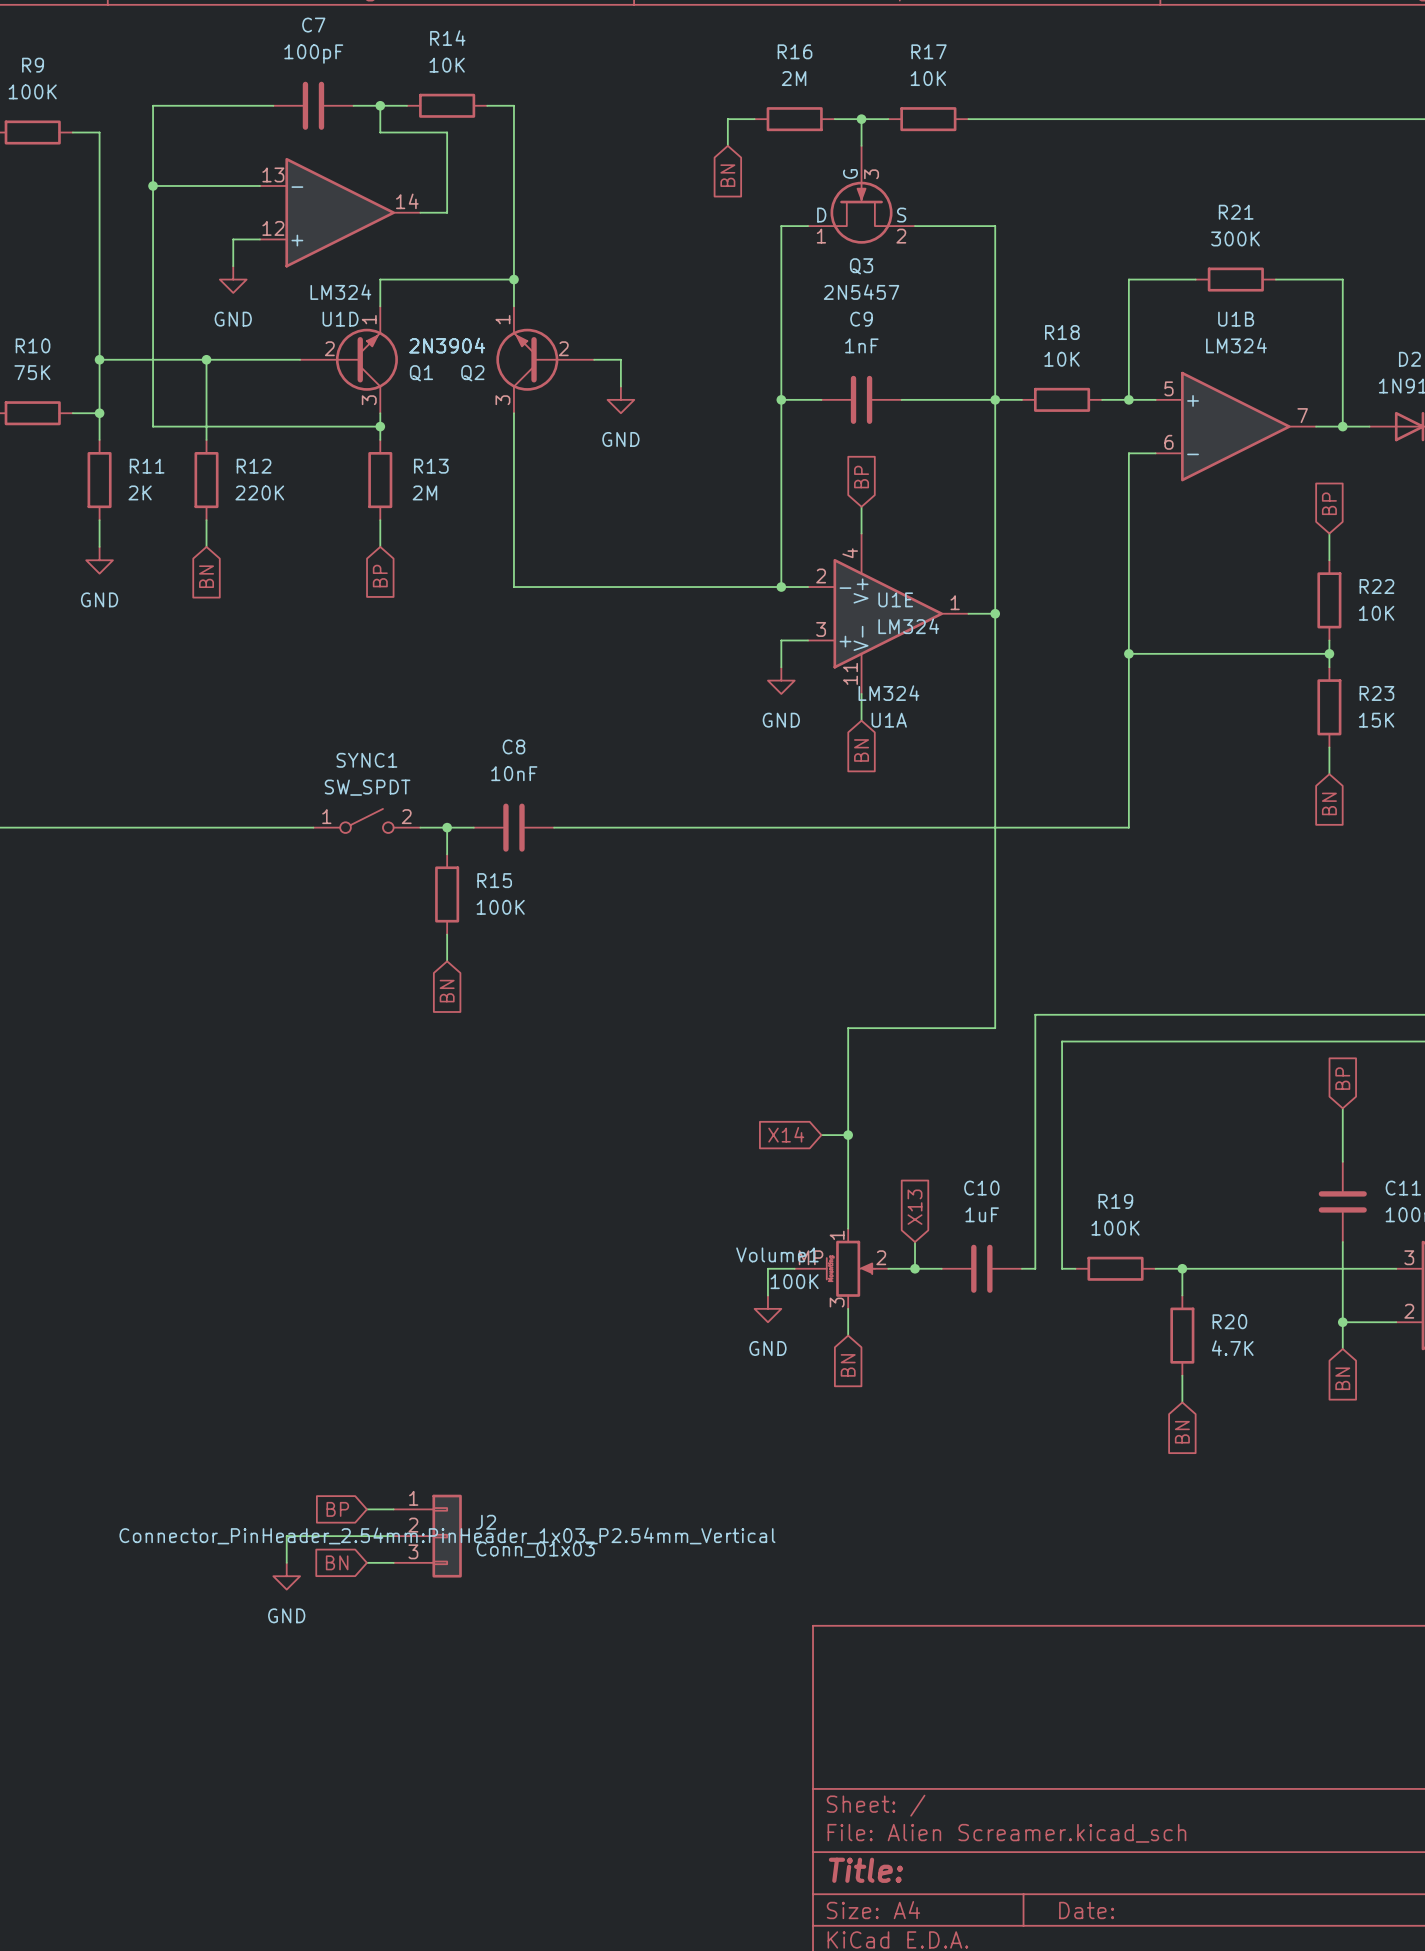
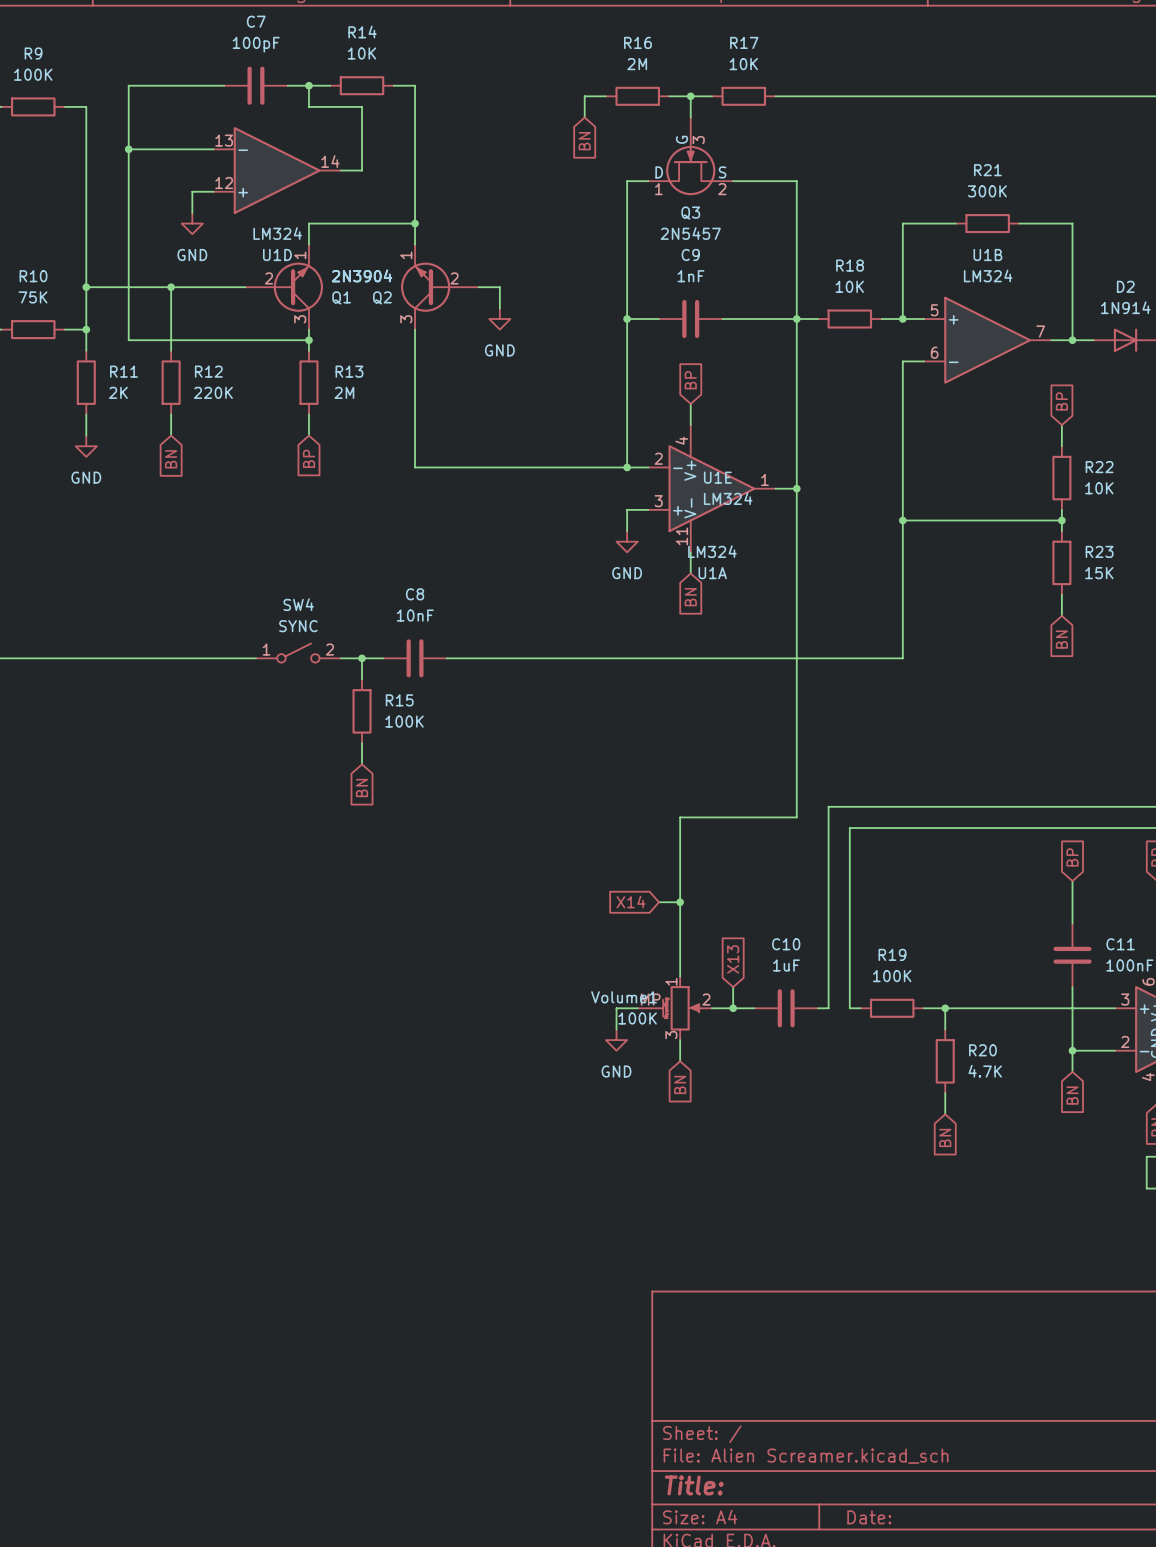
SYNC1 name: SYNC1 (366, 760) -> SW4 (298, 604)
SYNC1 value: SW_SPDT (367, 787) -> SYNC (298, 626)
global label: BP (337, 1509) -> none
wire: (366, 1509) (393, 1509) -> none
wire: (393, 1536) (286, 1536) (286, 1562) -> none
J2: Conn_01x03 (427, 1536) -> none
global label: BN (337, 1562) -> none
wire: (366, 1562) (393, 1562) -> none
power symbol: GND (286, 1576) -> none

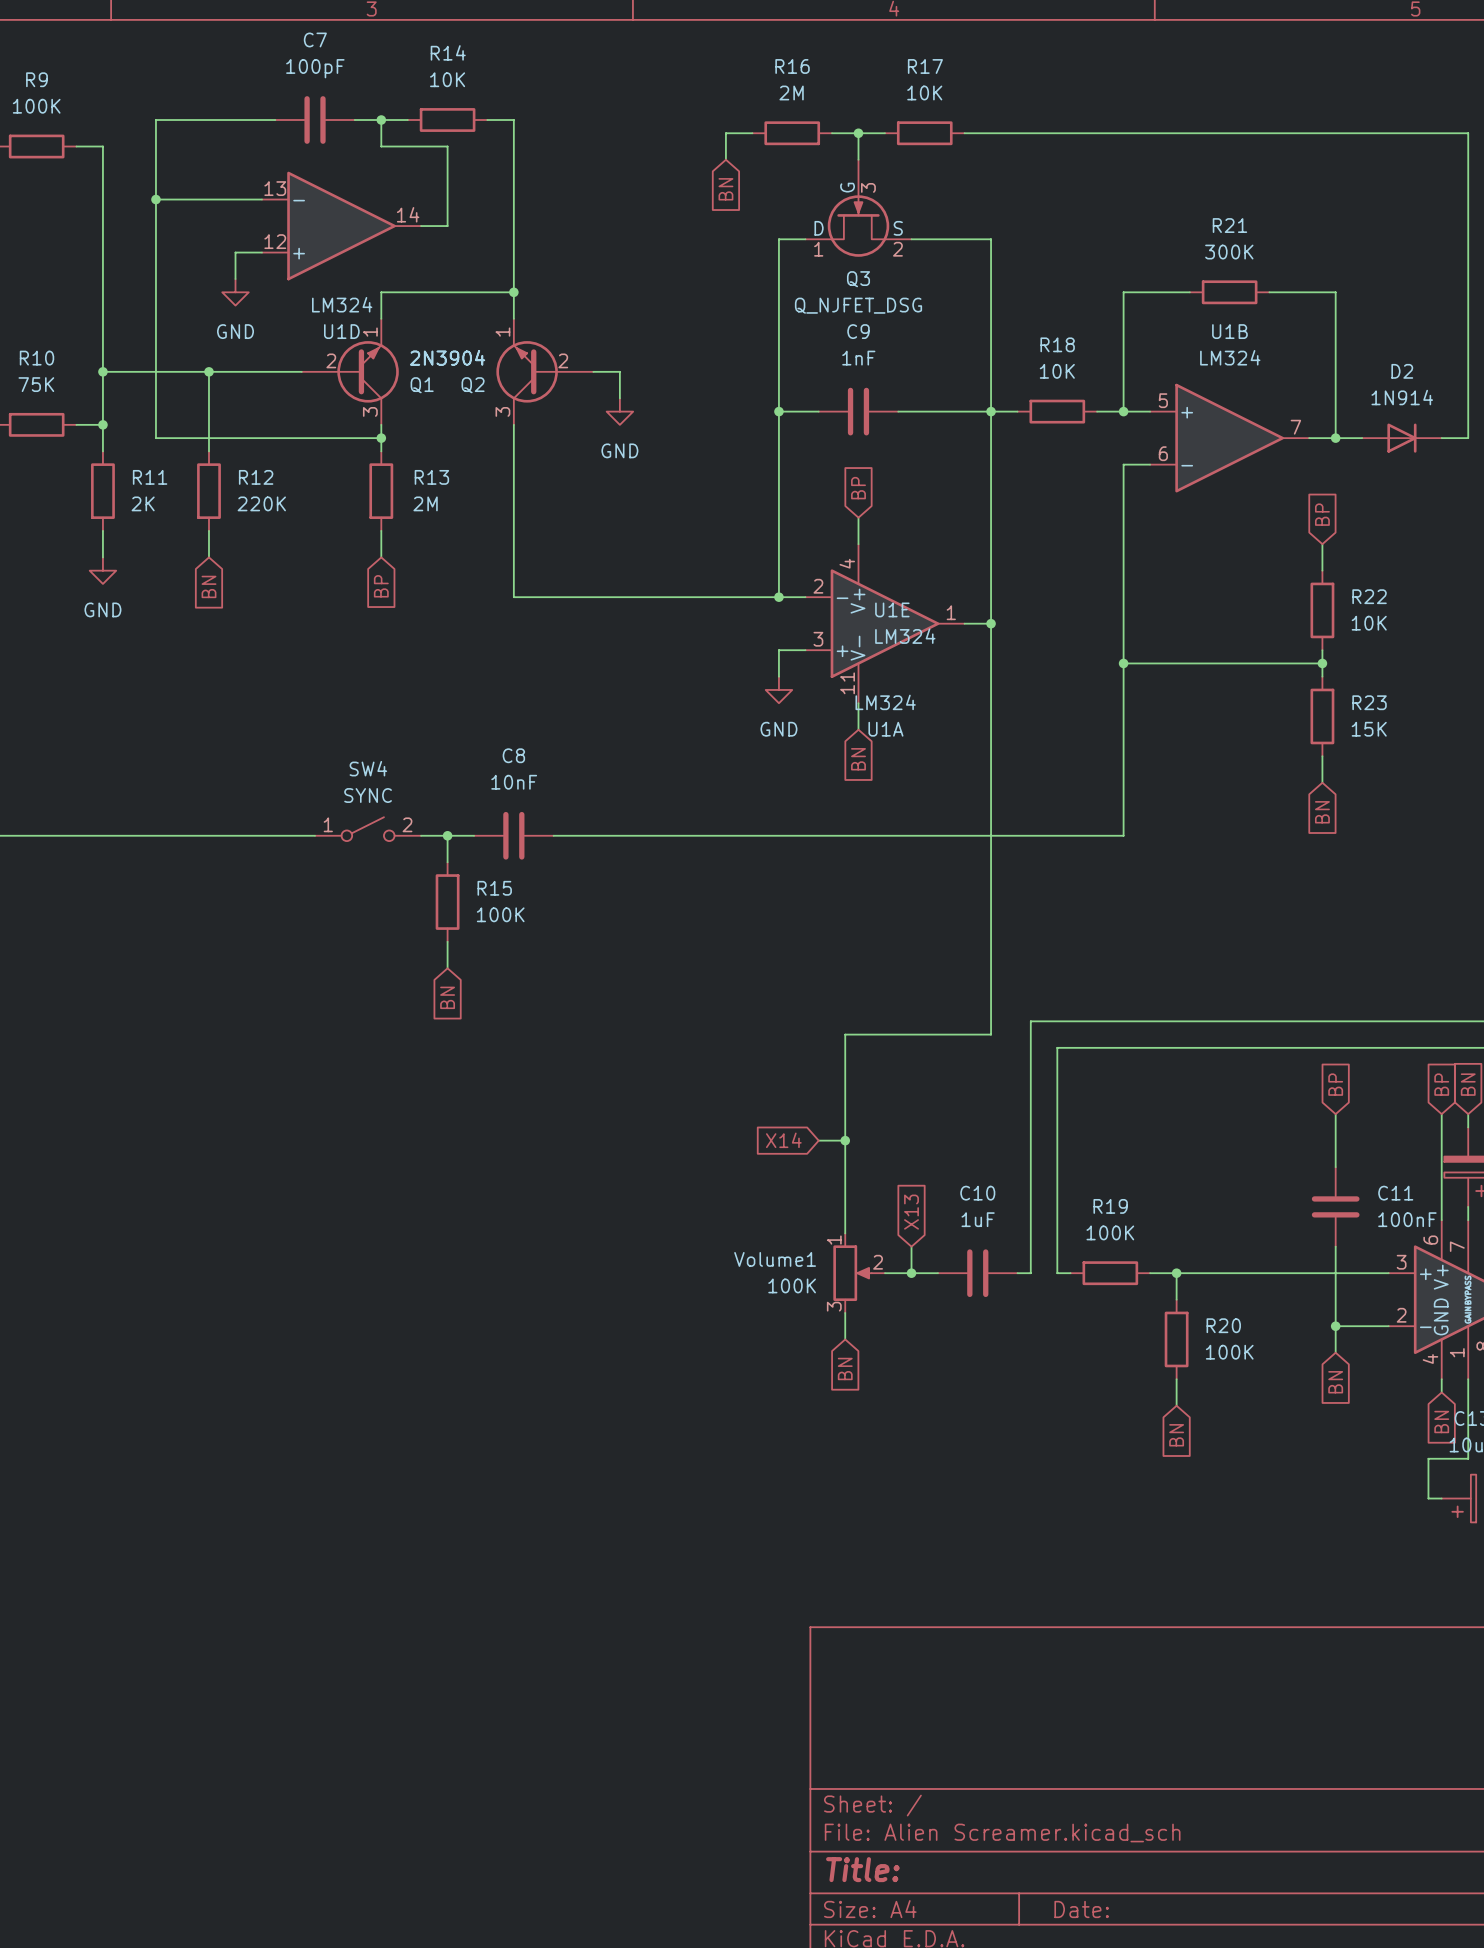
Q3 value: 2N5457 (690, 233) -> Q_NJFET_DSG (858, 305)
Volume1 symbol: [637, 976, 712, 1041] -> [833, 1233, 886, 1313]
wire: (637, 1008) (616, 1008) (616, 1029) -> none
power symbol: GND (616, 1040) -> none
R20 value: 4.7K (985, 1071) -> 100K (1229, 1352)

